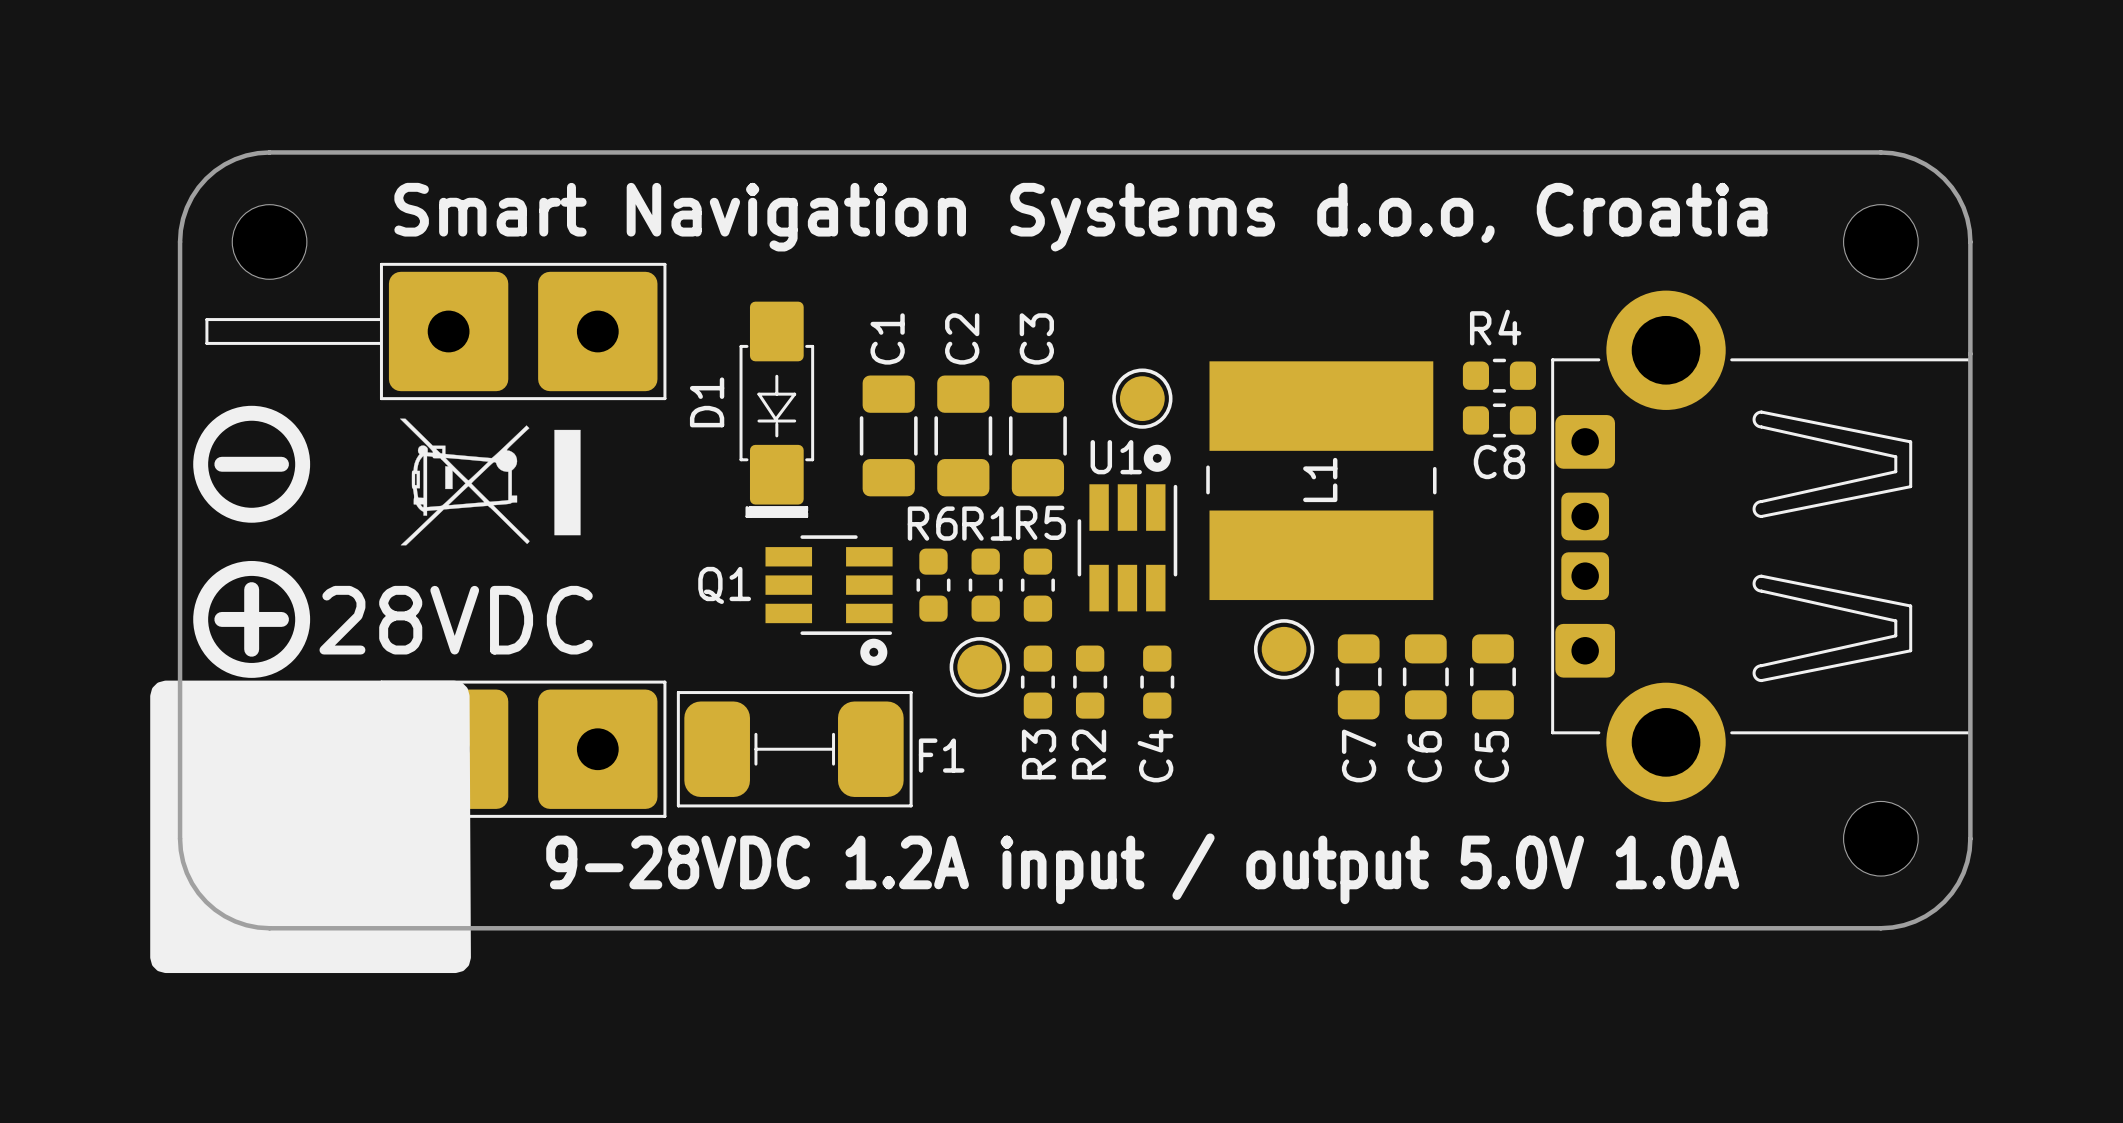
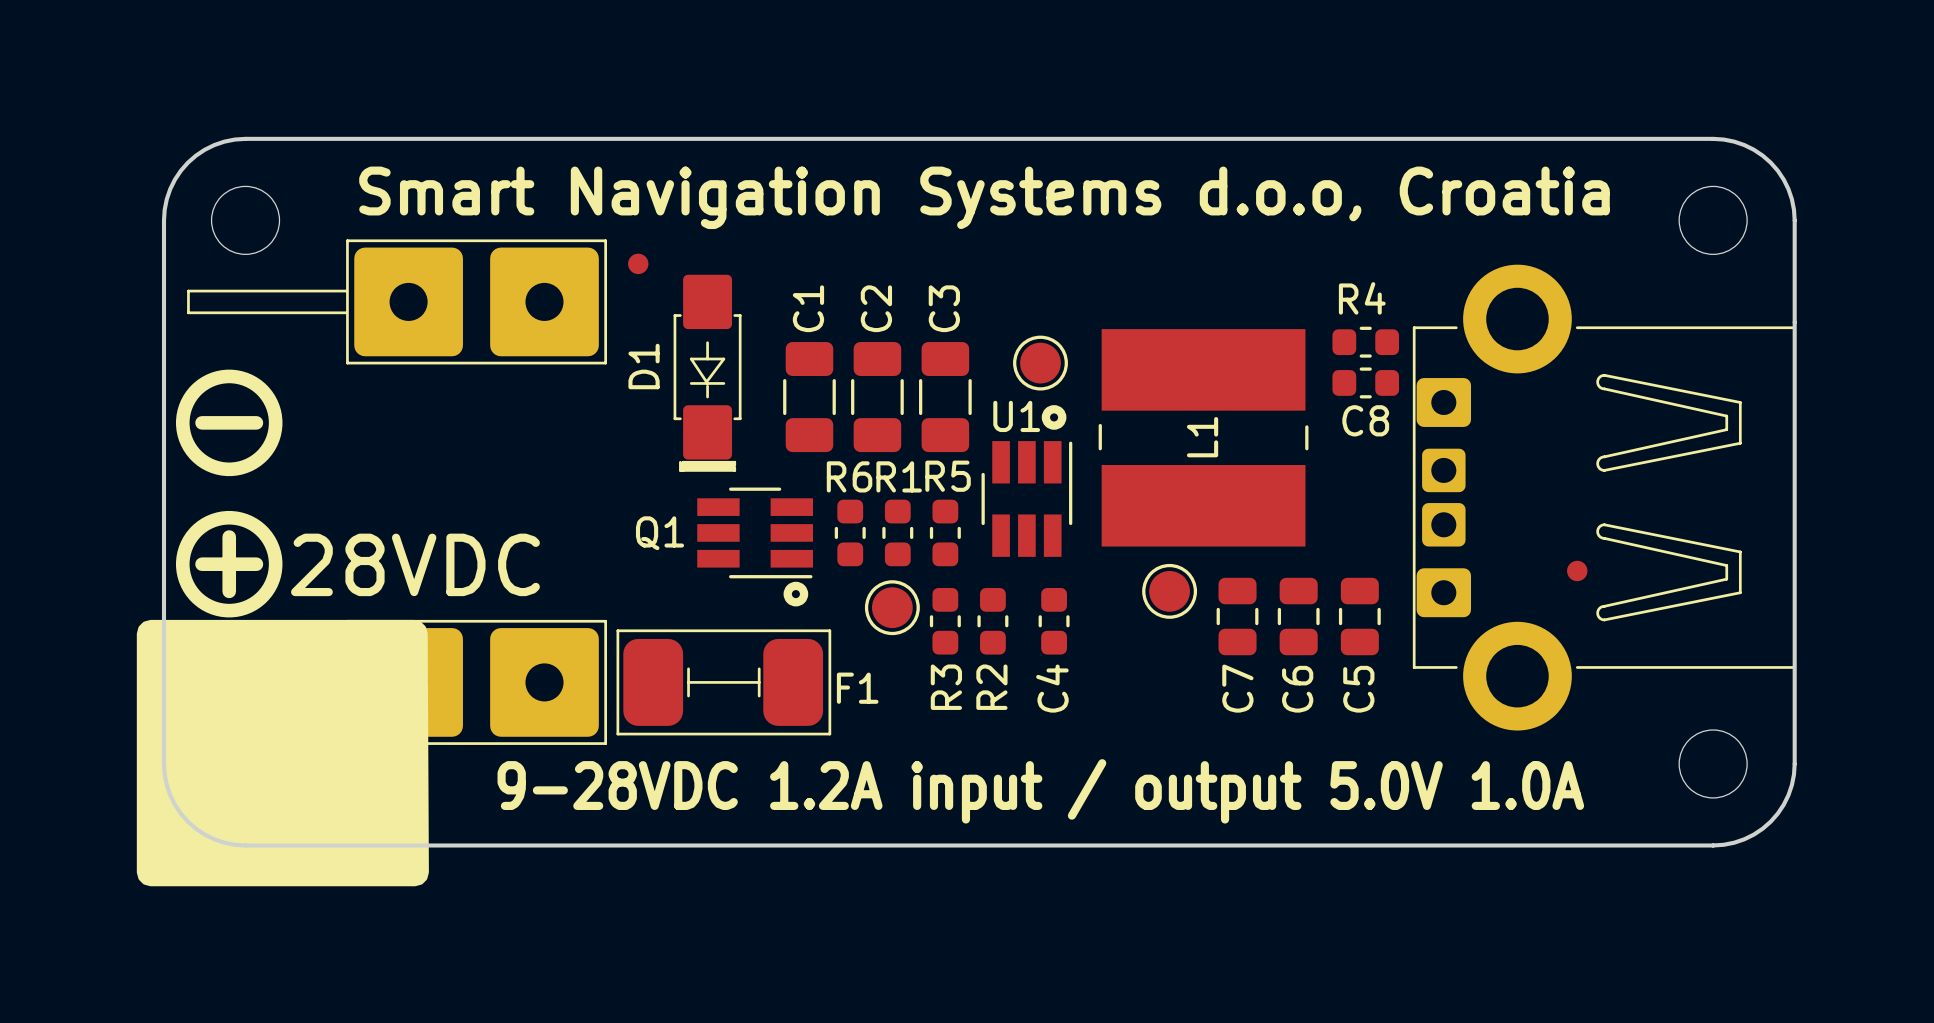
part: none -> (638, 263)
drawing: [400, 418, 581, 546] -> none
part: none -> (1577, 570)

